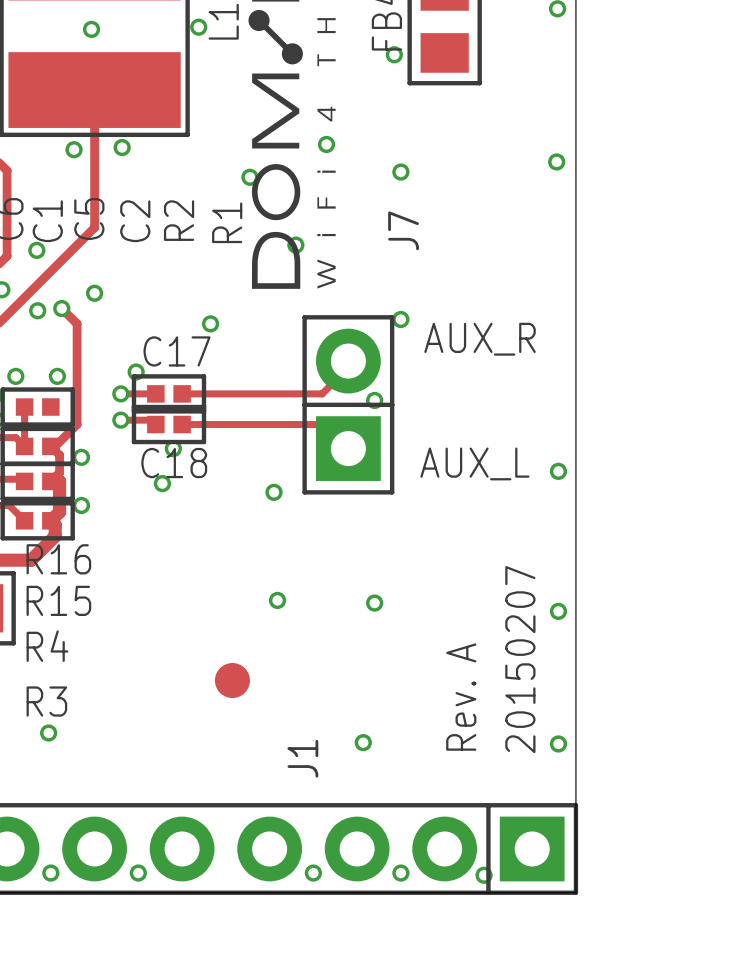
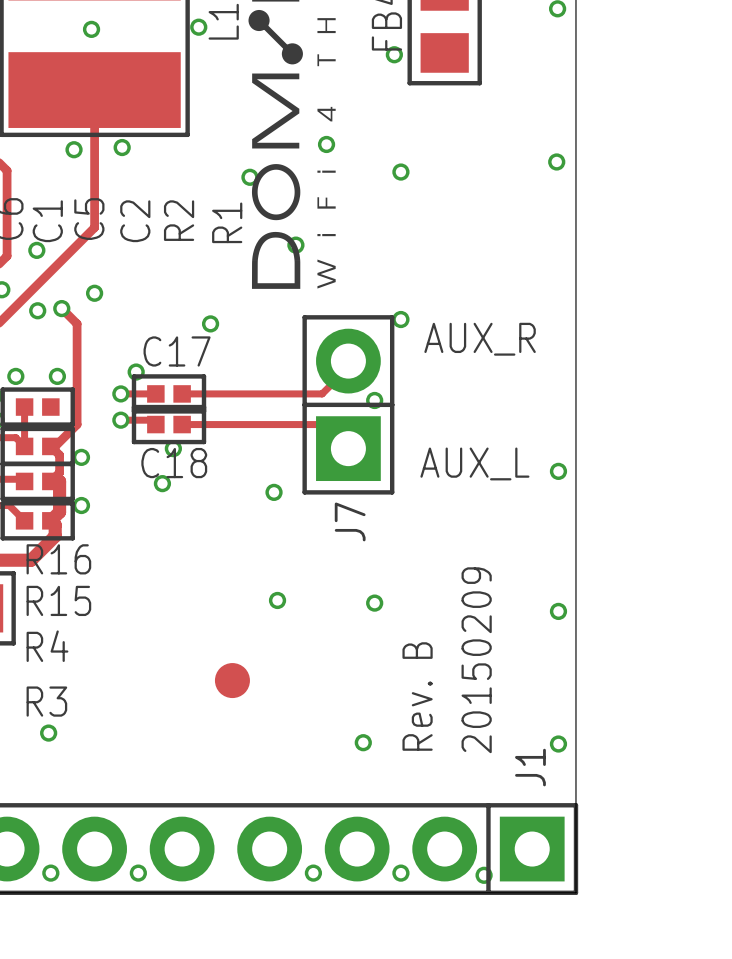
J7 name position: J7 (403, 230) -> J7 (350, 521)
text: none -> B (417, 650)
text: A (461, 652) -> none
text: 20150207 (520, 659) -> none
text: none -> Rev. (417, 716)
text: Rev. (461, 716) -> 20150209 (476, 660)
J1 name position: J1 (302, 758) -> J1 (530, 767)

